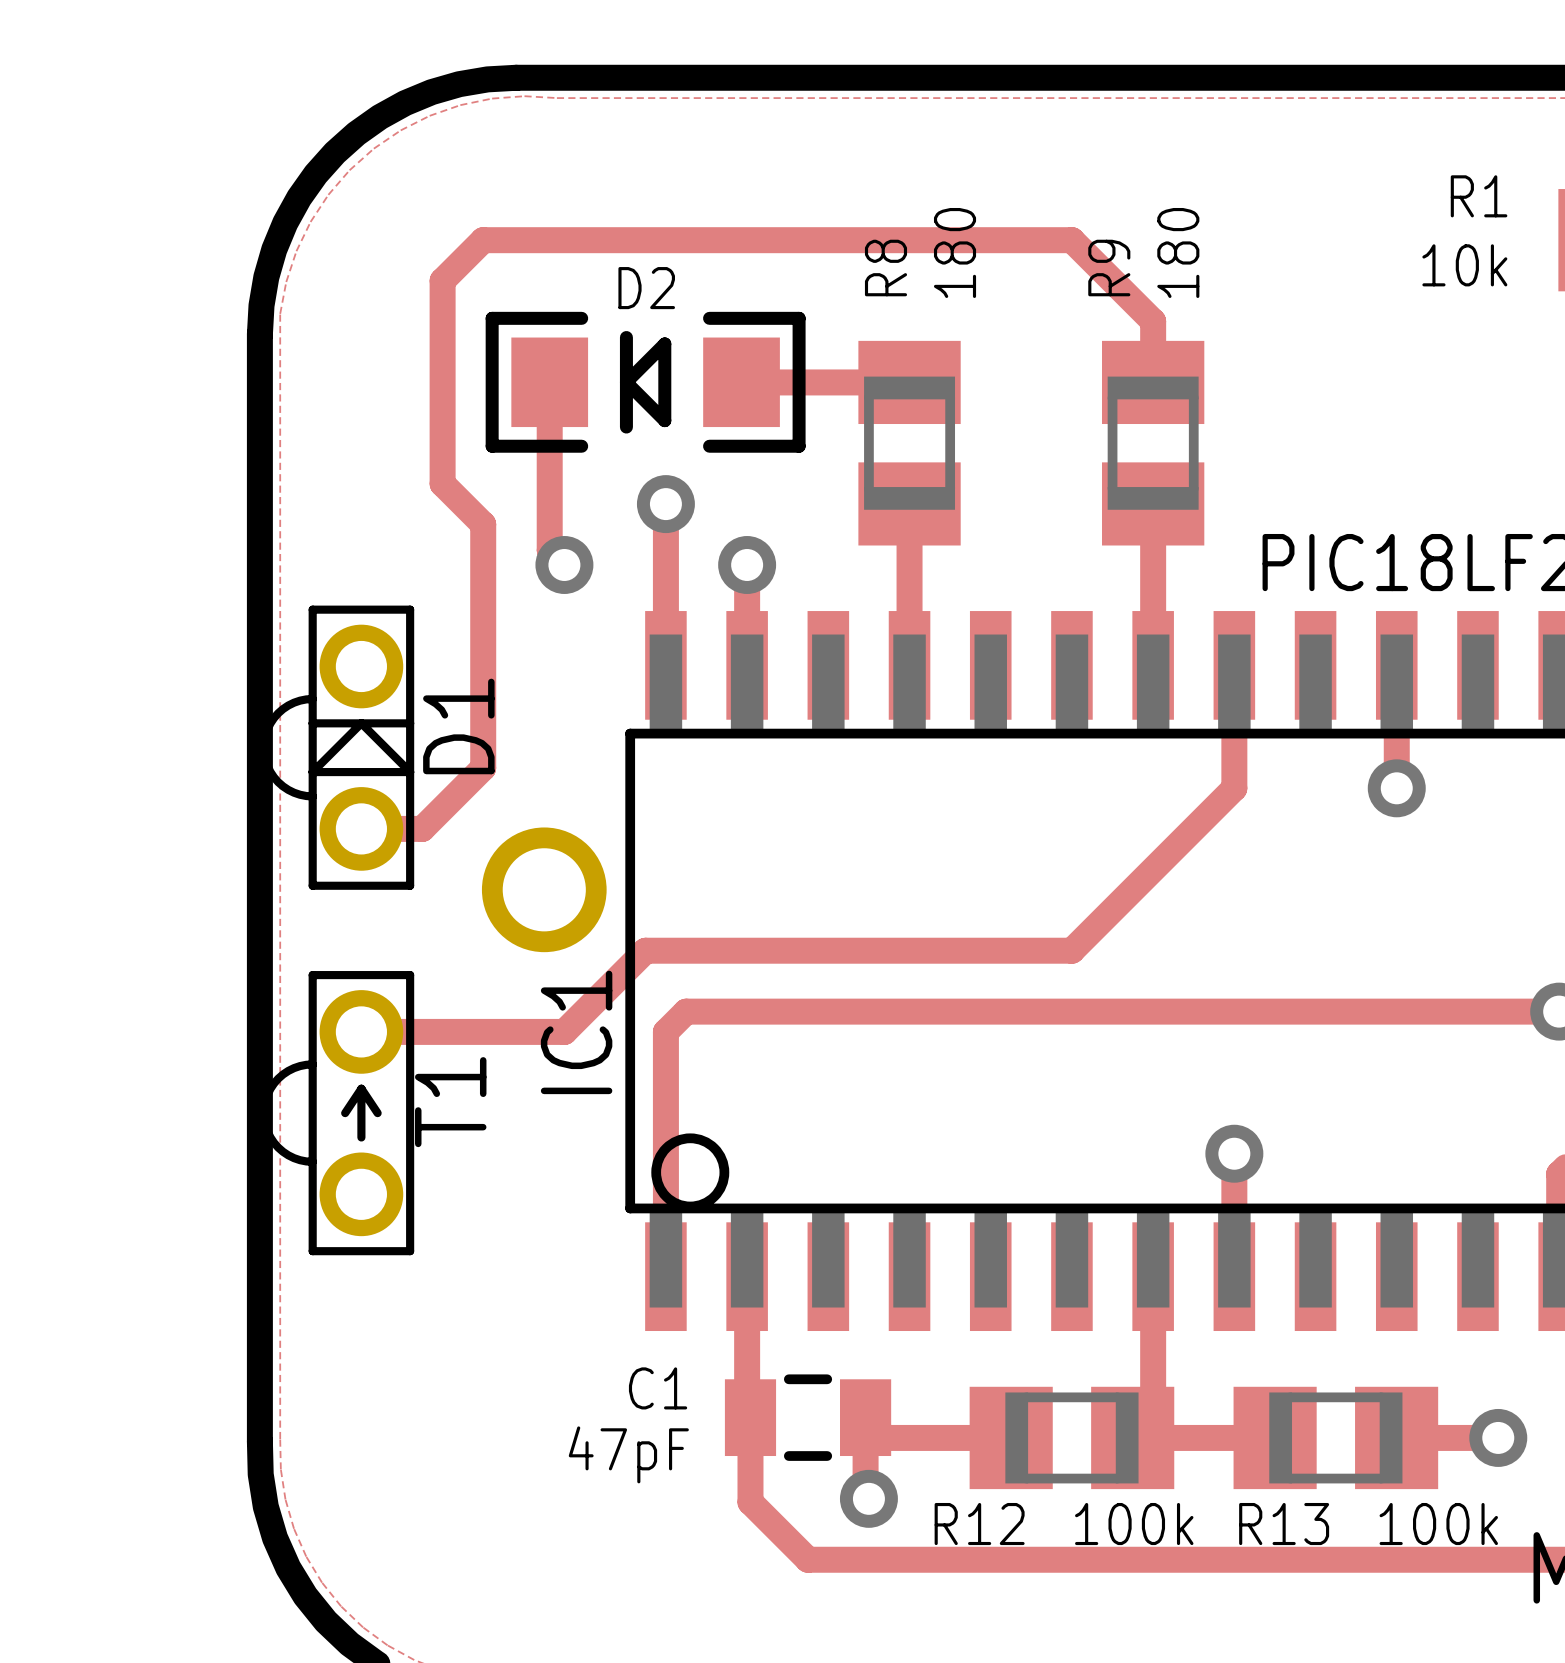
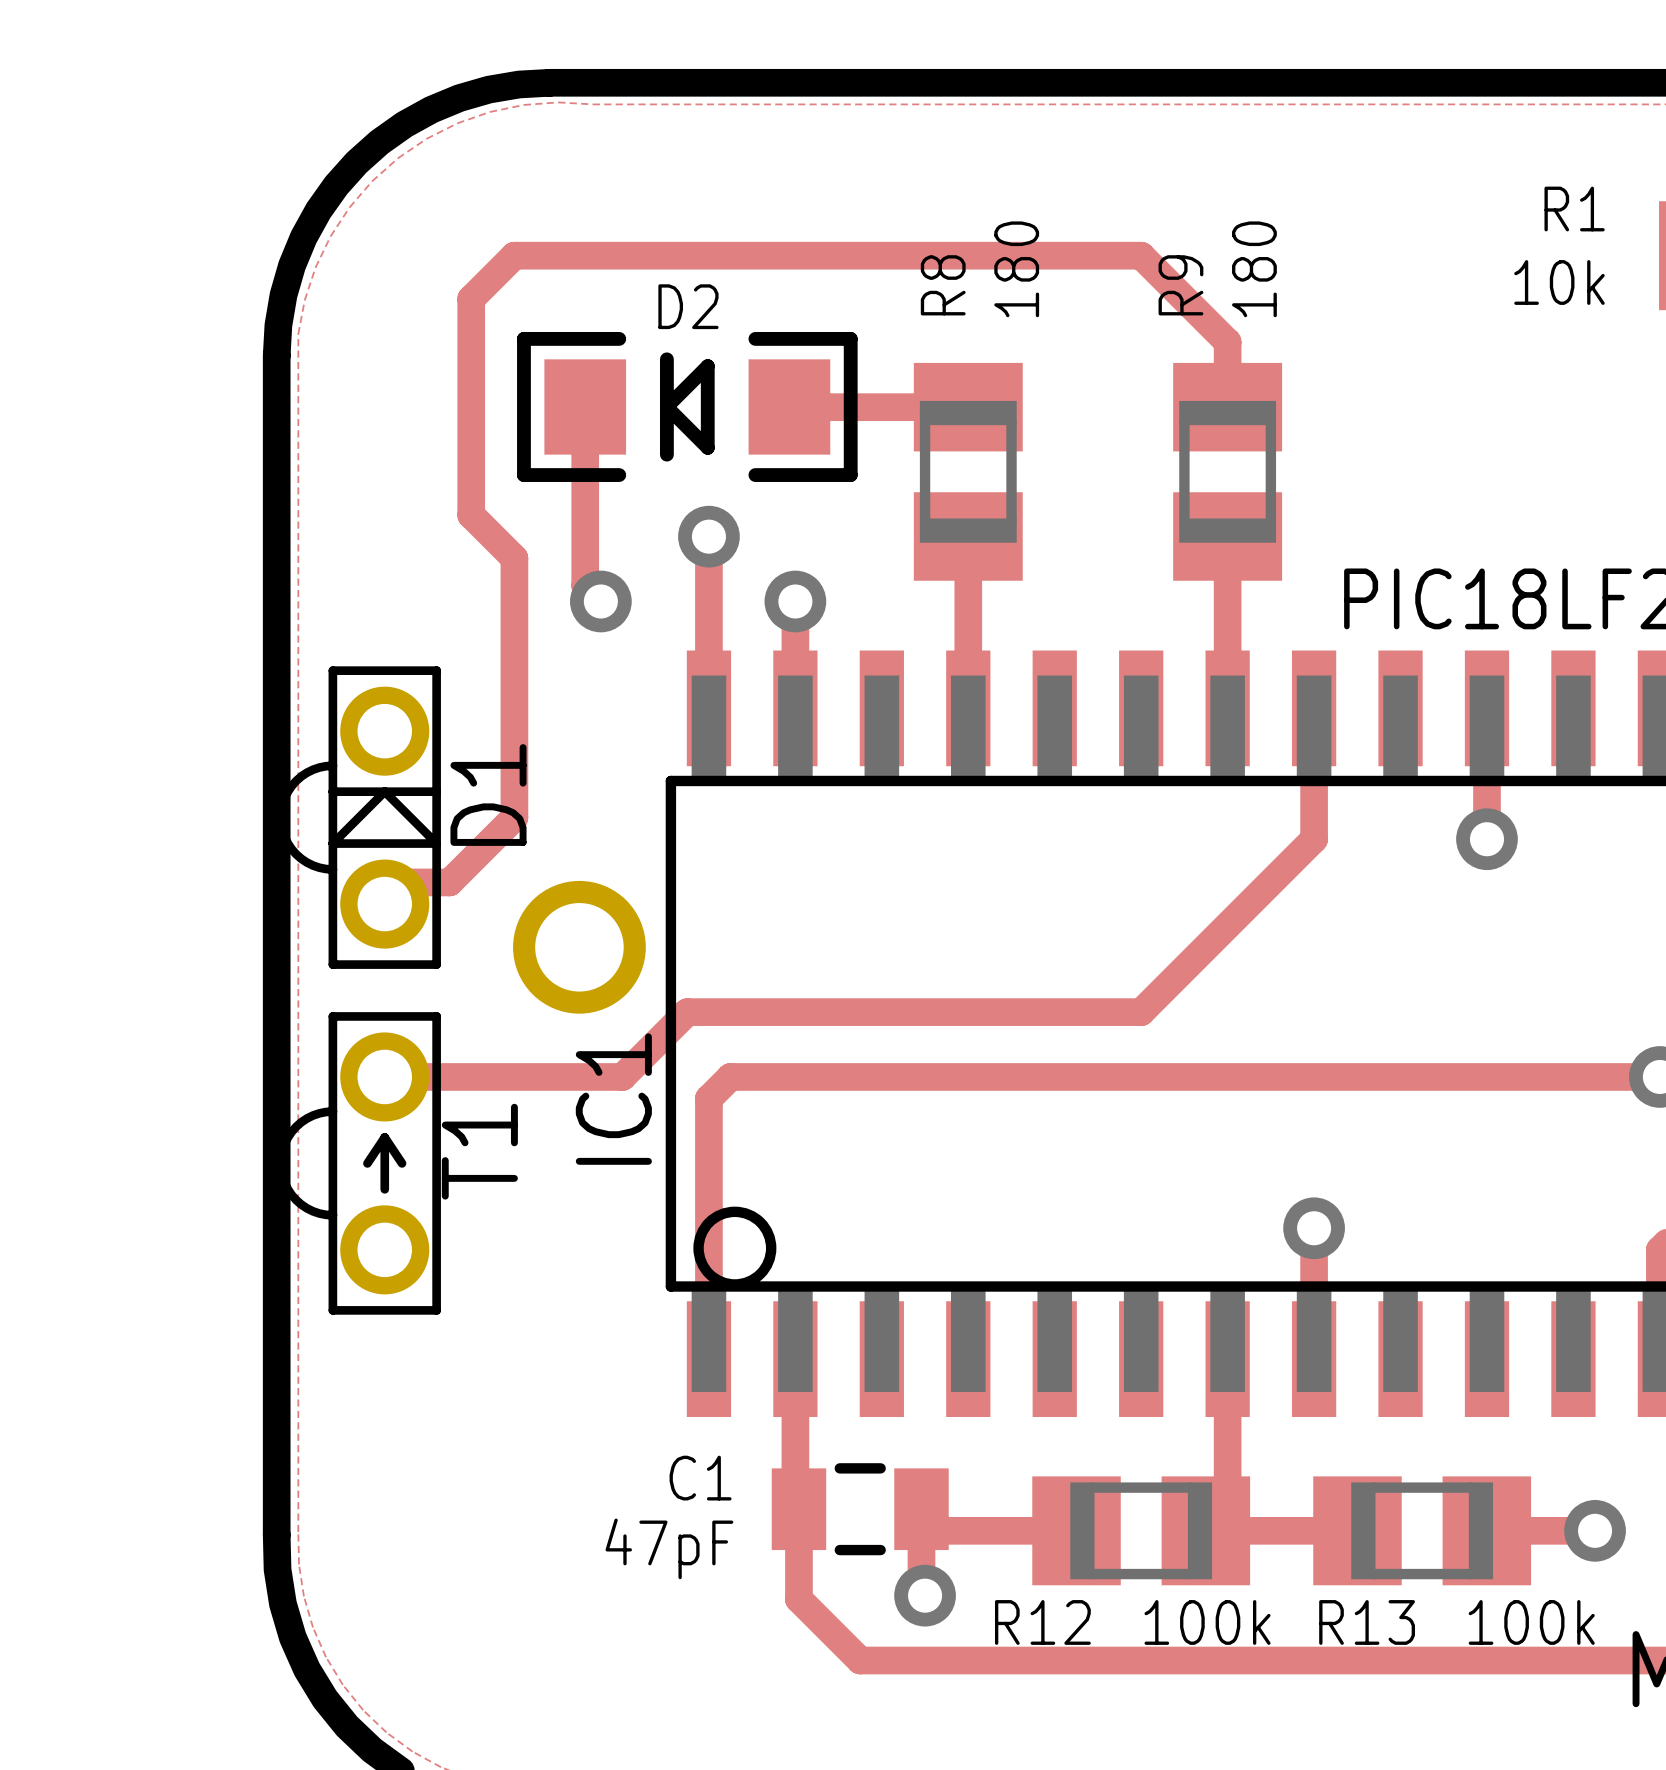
D1 position: (337, 747) -> (358, 817)
track: (584, 1011) (564, 1031) (361, 1031) -> (622, 1076) (384, 1076)
T1 position: (337, 1113) -> (358, 1163)

